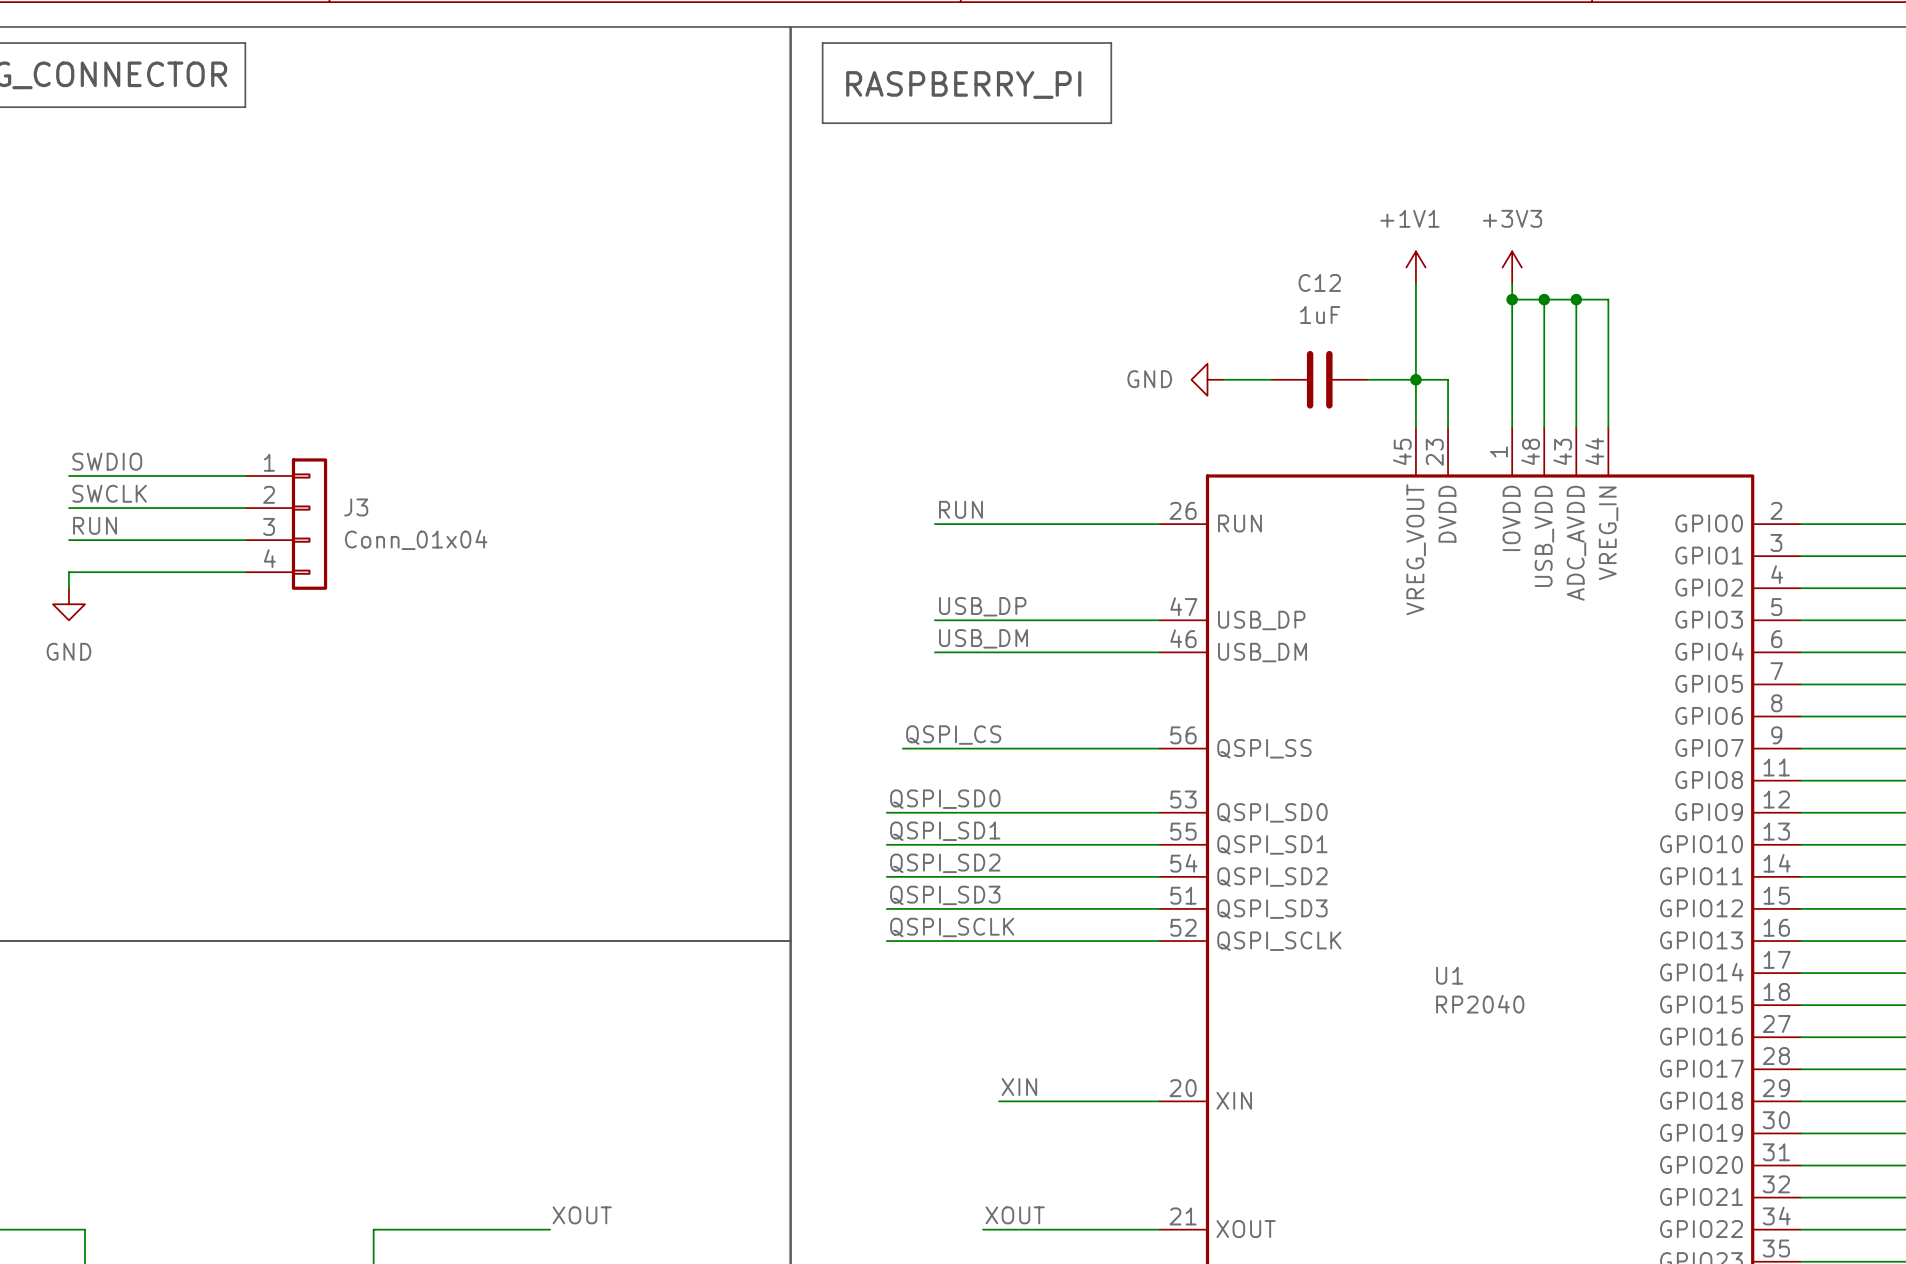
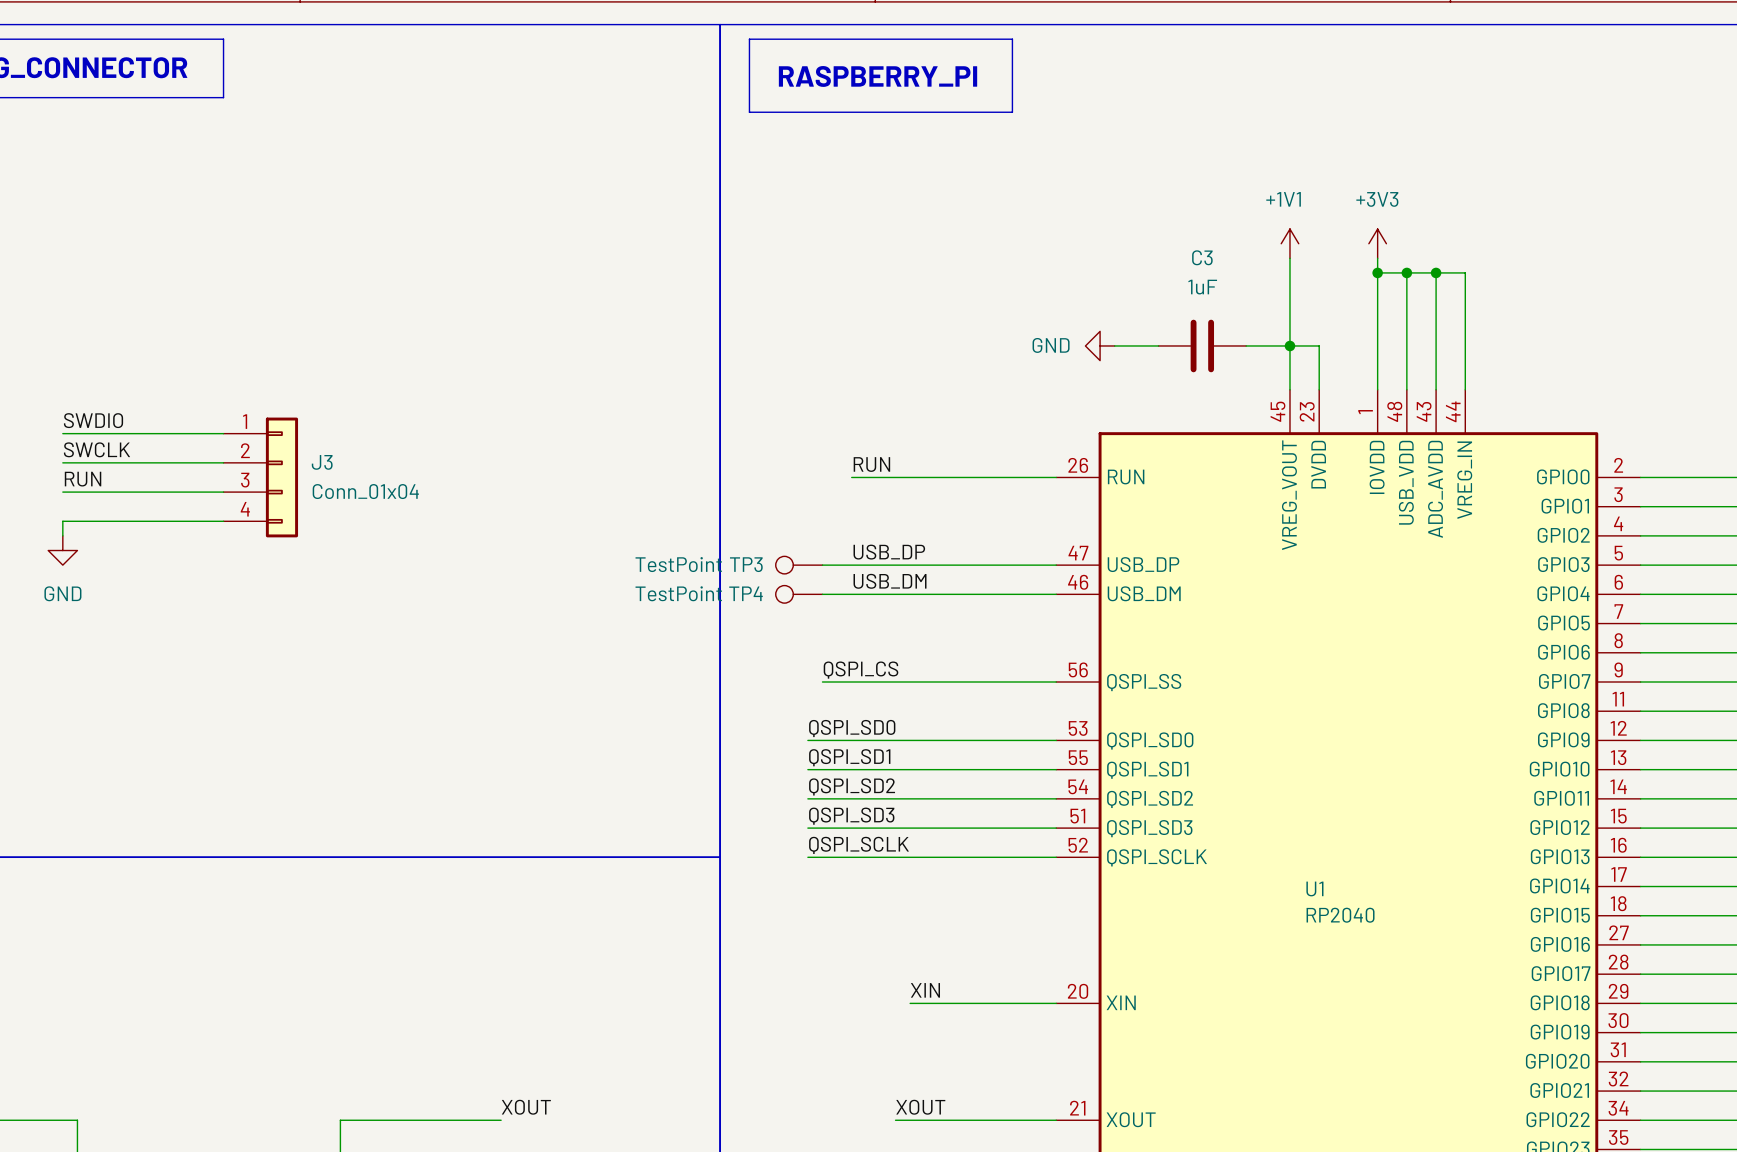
C12 name: C12 (1319, 282) -> C3 (1202, 257)
TP3: none -> TestPoint (799, 565)
wire: none -> (822, 565) (851, 565)
TP4: none -> TestPoint (799, 594)
wire: none -> (822, 594) (851, 594)

